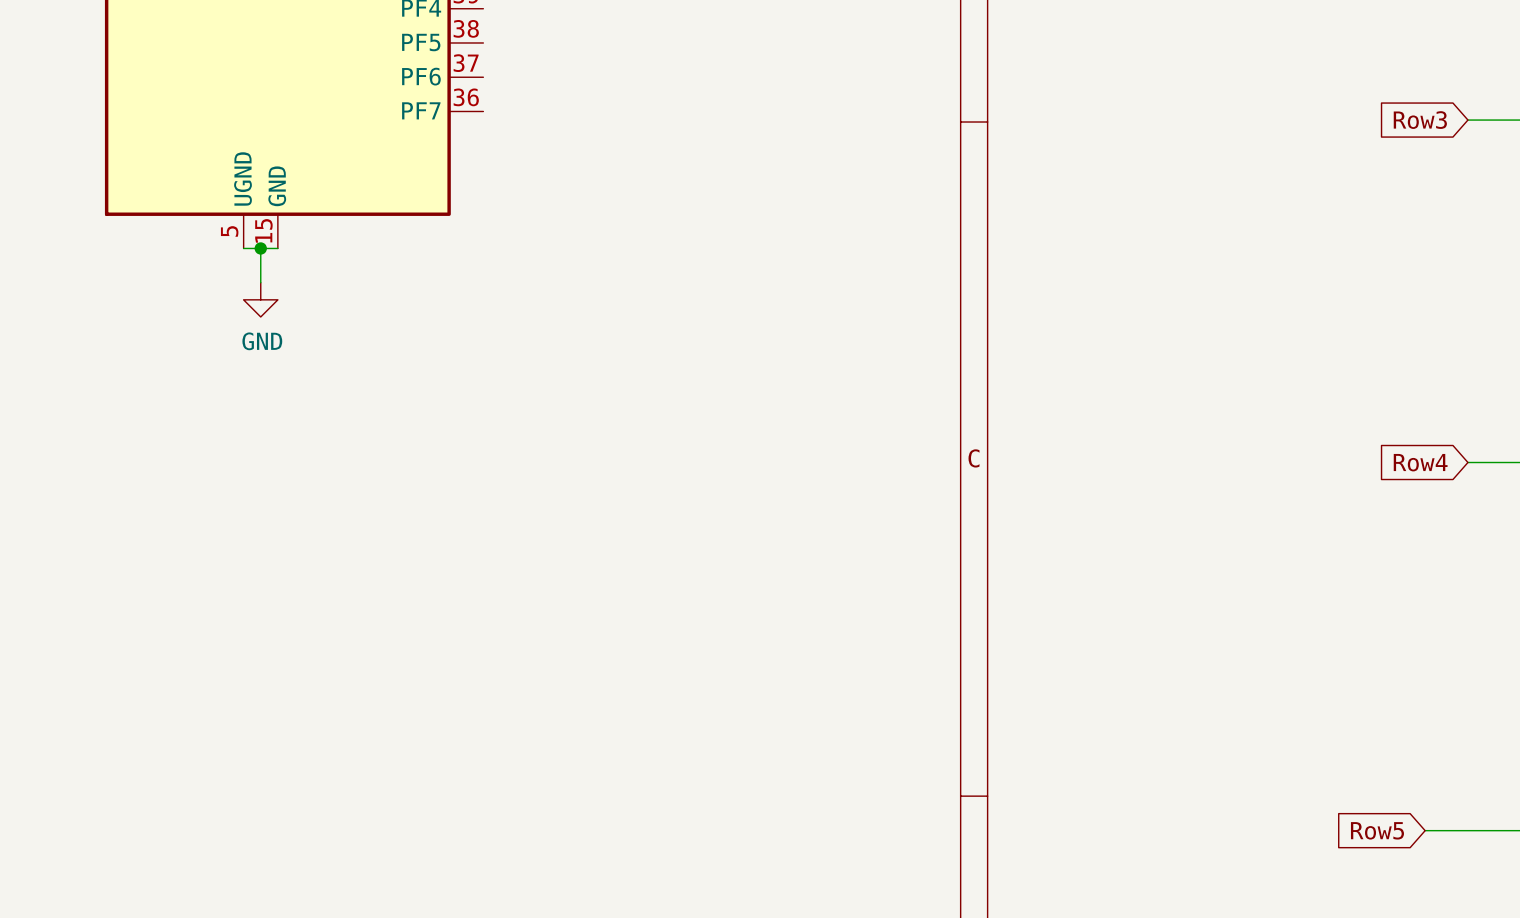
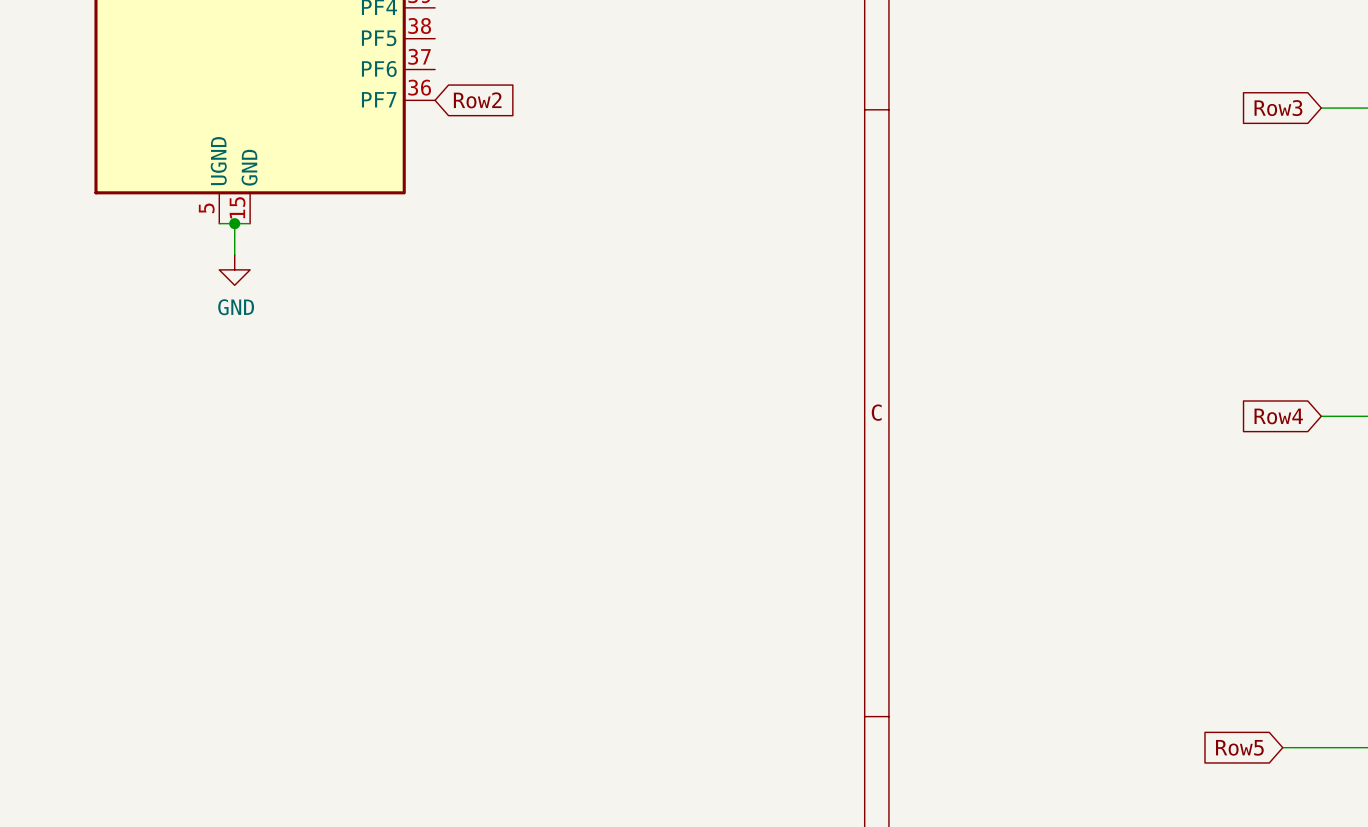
global label: none -> Row2 (477, 100)

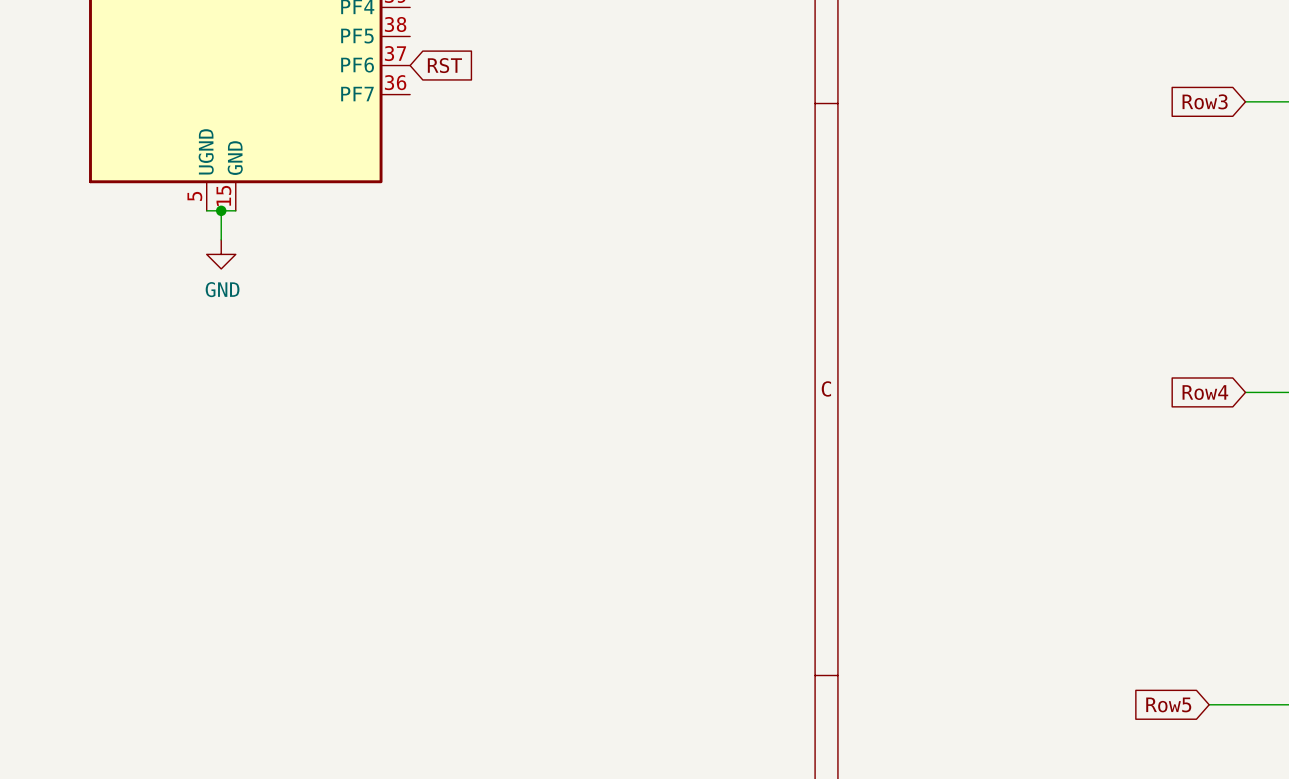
global label: none -> RST (444, 65)
global label: Row2 (477, 100) -> none

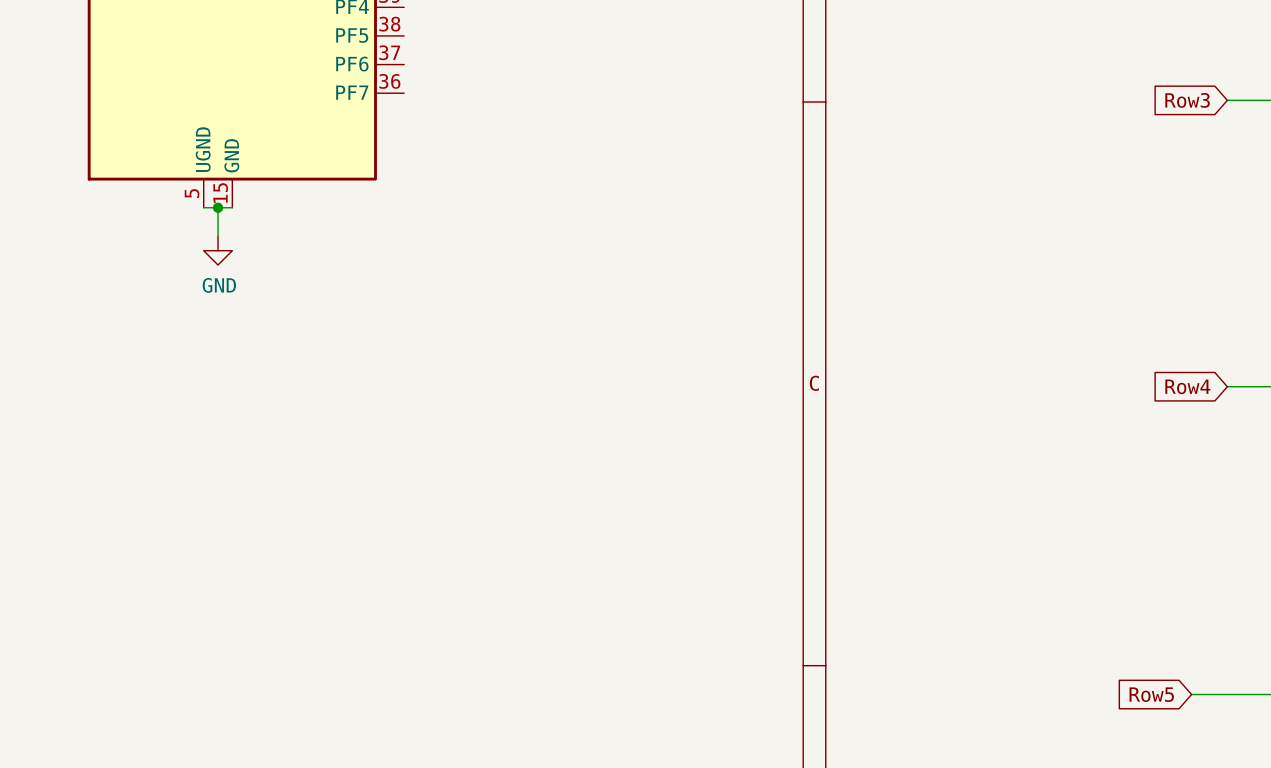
global label: RST (444, 65) -> none

